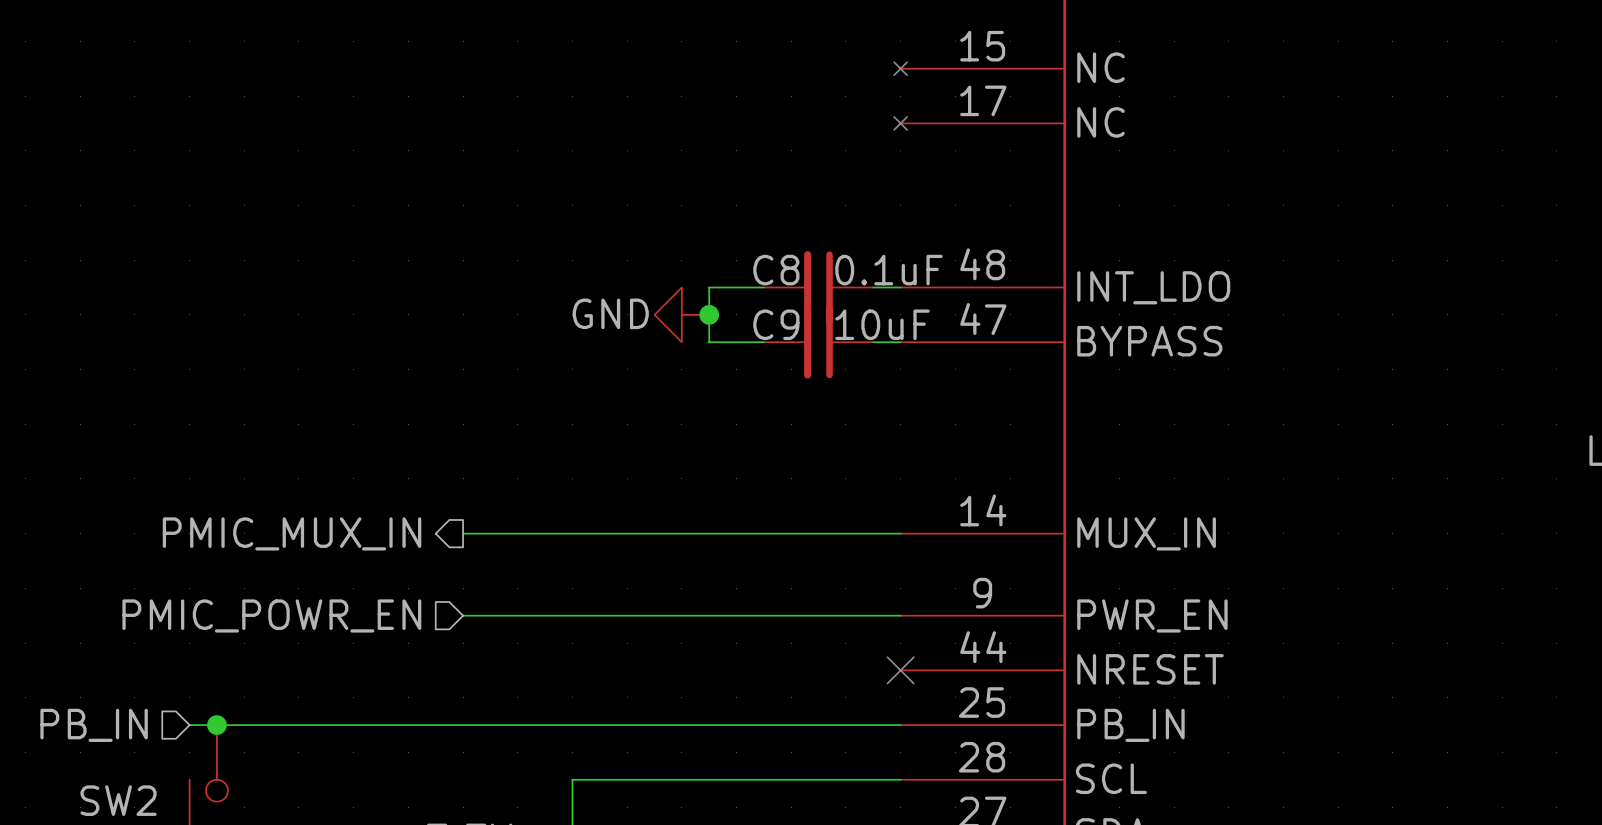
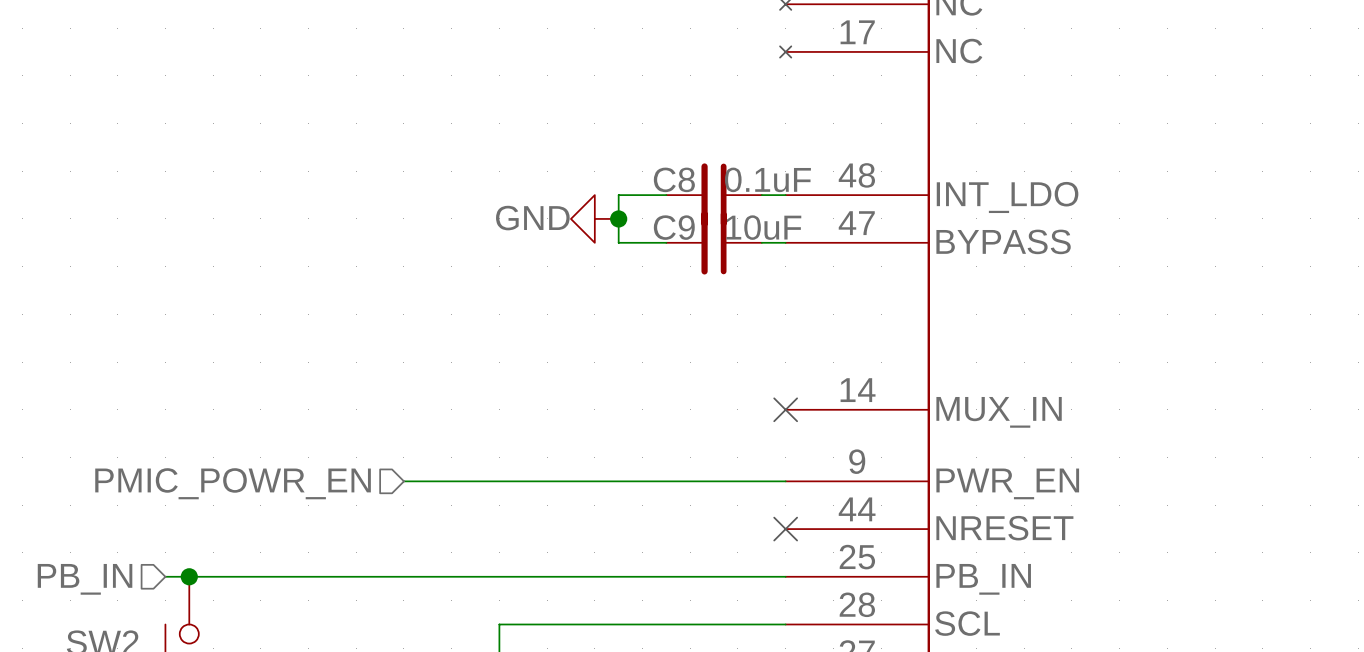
hierarchical label: PMIC_MUX_IN (292, 533) -> none
wire: (463, 533) (900, 533) -> none
no-connect mark: none -> (785, 409)

